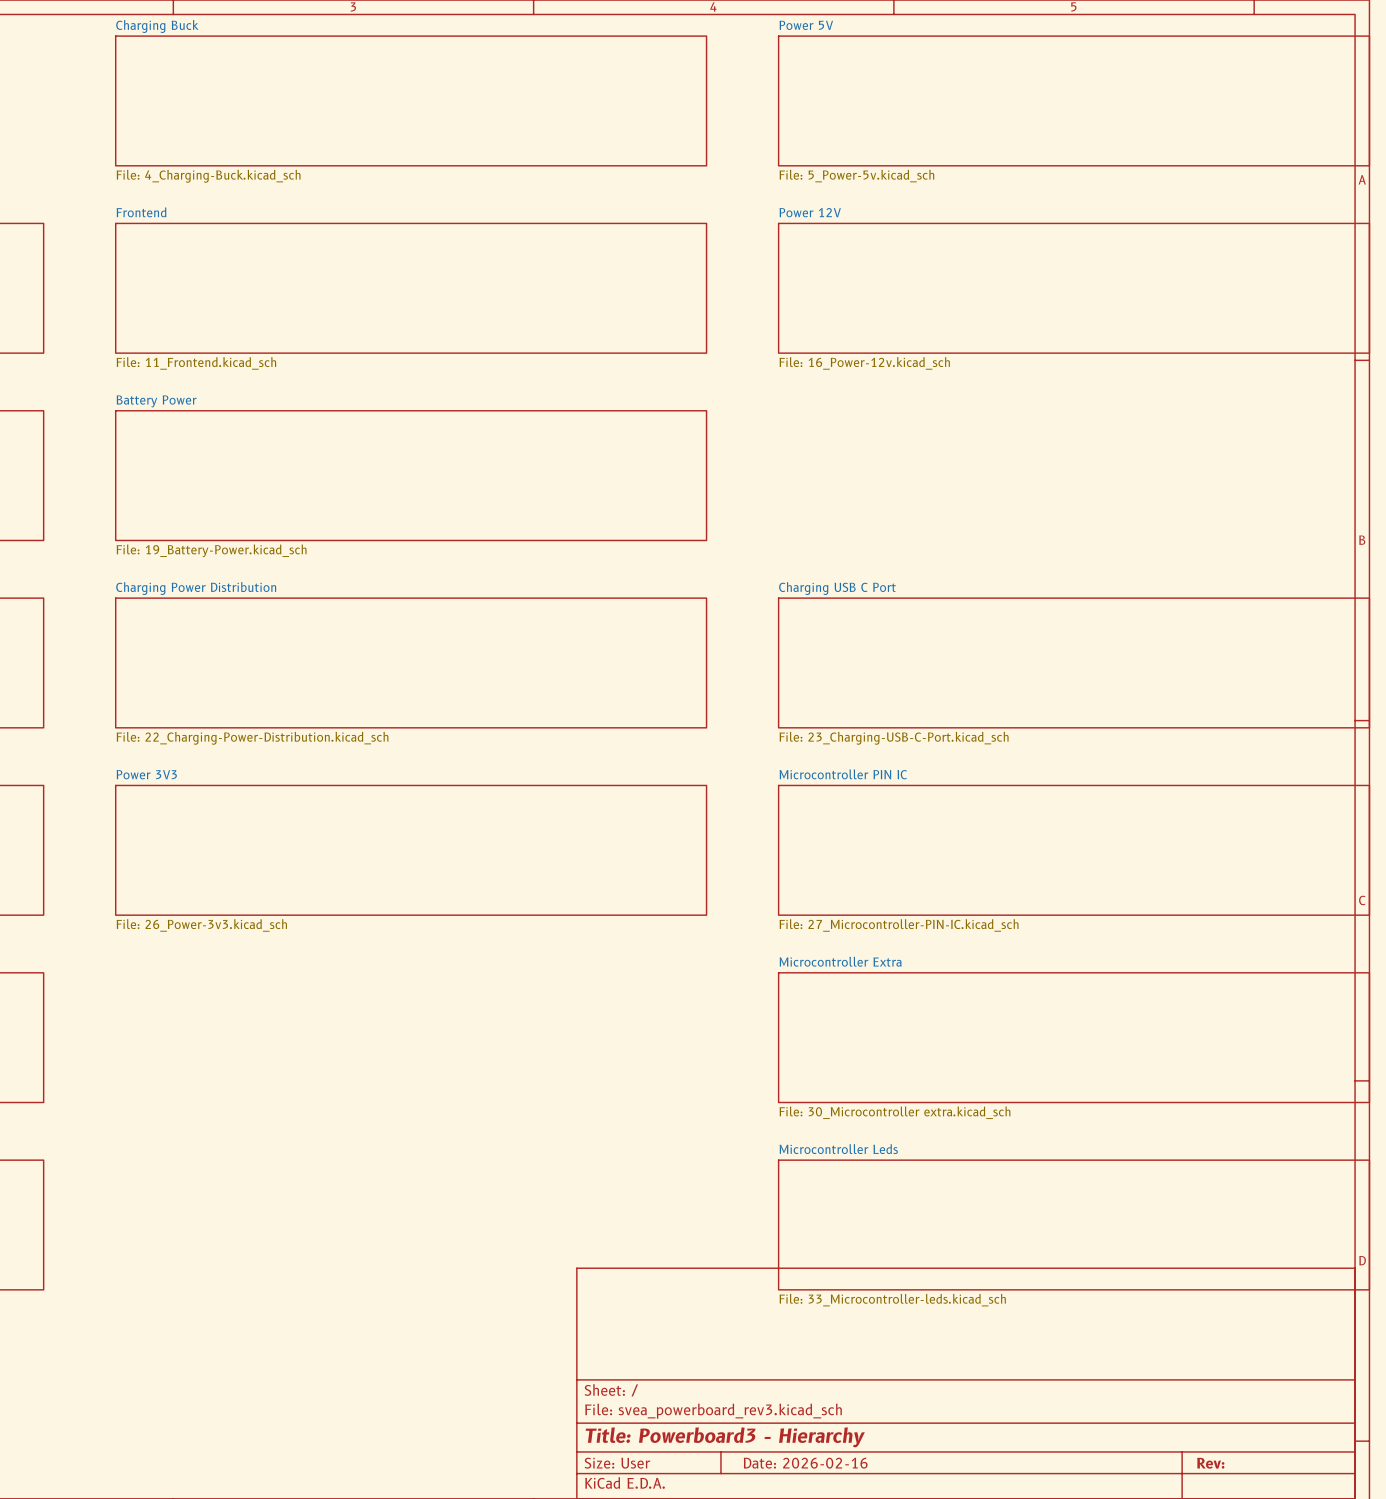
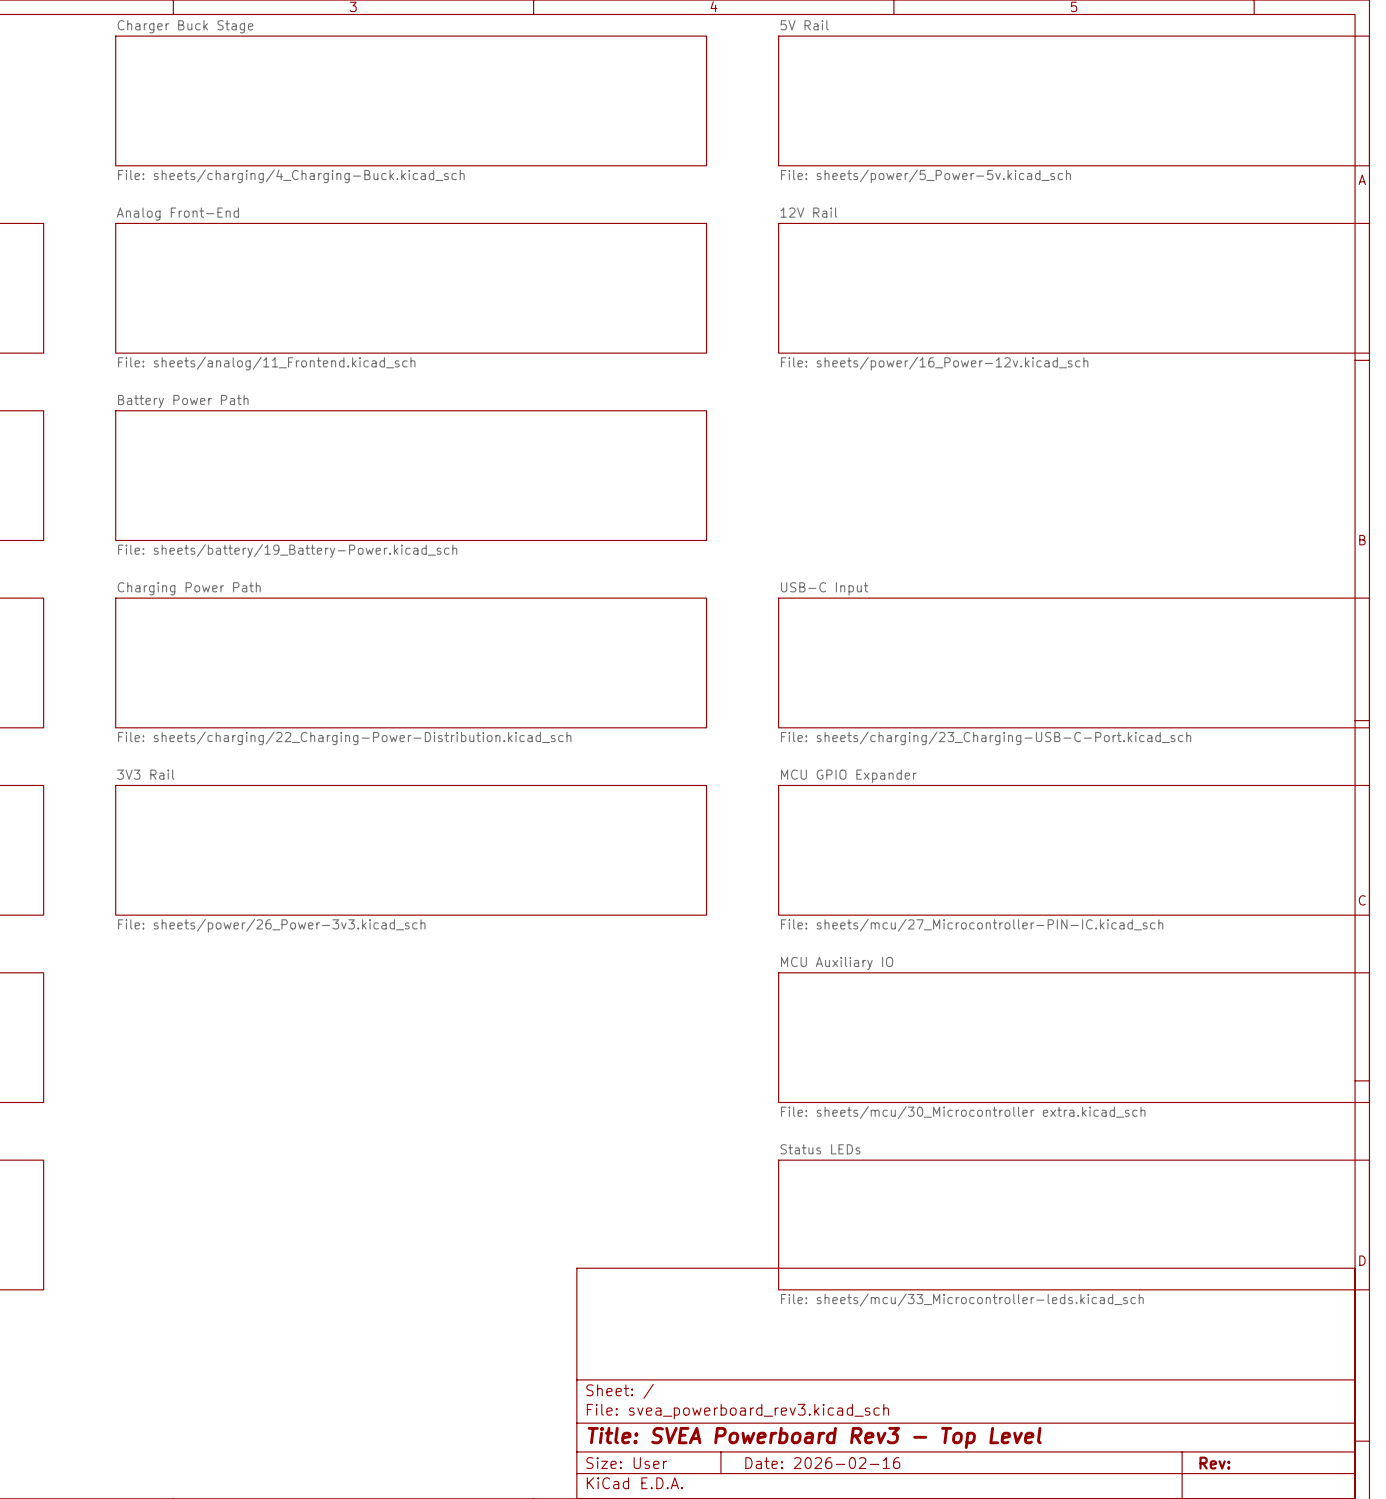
sheet Power 5V name: Power 5V (806, 25) -> 5V Rail (804, 25)
sheet Charging Buck name: Charging Buck (157, 26) -> Charger Buck Stage (185, 26)
sheet Charging Buck value: File: 4_Charging-Buck.kicad_sch (208, 176) -> File: sheets/charging/4_Charging-Buck.kicad_sch (291, 176)
sheet Power 5V value: File: 5_Power-5v.kicad_sch (856, 176) -> File: sheets/power/5_Power-5v.kicad_sch (925, 176)
sheet Frontend name: Frontend (141, 212) -> Analog Front-End (177, 214)
sheet Power 12V name: Power 12V (810, 212) -> 12V Rail (808, 212)
sheet Frontend value: File: 11_Frontend.kicad_sch (196, 363) -> File: sheets/analog/11_Frontend.kicad_sch (266, 363)
sheet Power 12V value: File: 16_Power-12v.kicad_sch (864, 363) -> File: sheets/power/16_Power-12v.kicad_sch (934, 363)
sheet Battery Power name: Battery Power (156, 401) -> Battery Power Path (183, 401)
sheet Battery Power value: File: 19_Battery-Power.kicad_sch (211, 550) -> File: sheets/battery/19_Battery-Power.kicad_sch (287, 551)
sheet Charging Power Distribution name: Charging Power Distribution (196, 588) -> Charging Power Path (189, 588)
sheet Charging USB C Port name: Charging USB C Port (837, 588) -> USB-C Input (824, 588)
sheet Charging Power Distribution value: File: 22_Charging-Power-Distribution.kicad_sch (252, 738) -> File: sheets/charging/22_Charging-Power-Distribution.kicad_sch (344, 738)
sheet Charging USB C Port value: File: 23_Charging-USB-C-Port.kicad_sch (894, 738) -> File: sheets/charging/23_Charging-USB-C-Port.kicad_sch (986, 738)
sheet Power 3V3 name: Power 3V3 (146, 774) -> 3V3 Rail (145, 774)
sheet Microcontroller PIN IC name: Microcontroller PIN IC (843, 774) -> MCU GPIO Expander (848, 776)
sheet Power 3V3 value: File: 26_Power-3v3.kicad_sch (201, 925) -> File: sheets/power/26_Power-3v3.kicad_sch (271, 925)
sheet Microcontroller PIN IC value: File: 27_Microcontroller-PIN-IC.kicad_sch (899, 925) -> File: sheets/mcu/27_Microcontroller-PIN-IC.kicad_sch (972, 925)
sheet Microcontroller Extra name: Microcontroller Extra (840, 961) -> MCU Auxiliary IO (837, 963)
sheet Microcontroller Extra value: File: 30_Microcontroller extra.kicad_sch (894, 1112) -> File: sheets/mcu/30_Microcontroller extra.kicad_sch (963, 1112)
sheet Microcontroller Leds name: Microcontroller Leds (838, 1149) -> Status LEDs (820, 1149)
sheet Microcontroller Leds value: File: 33_Microcontroller-leds.kicad_sch (892, 1300) -> File: sheets/mcu/33_Microcontroller-leds.kicad_sch (962, 1299)
title block: Title: Powerboard3 - Hierarchy (725, 1437) -> Title: SVEA Powerboard Rev3 - Top Level (814, 1437)

